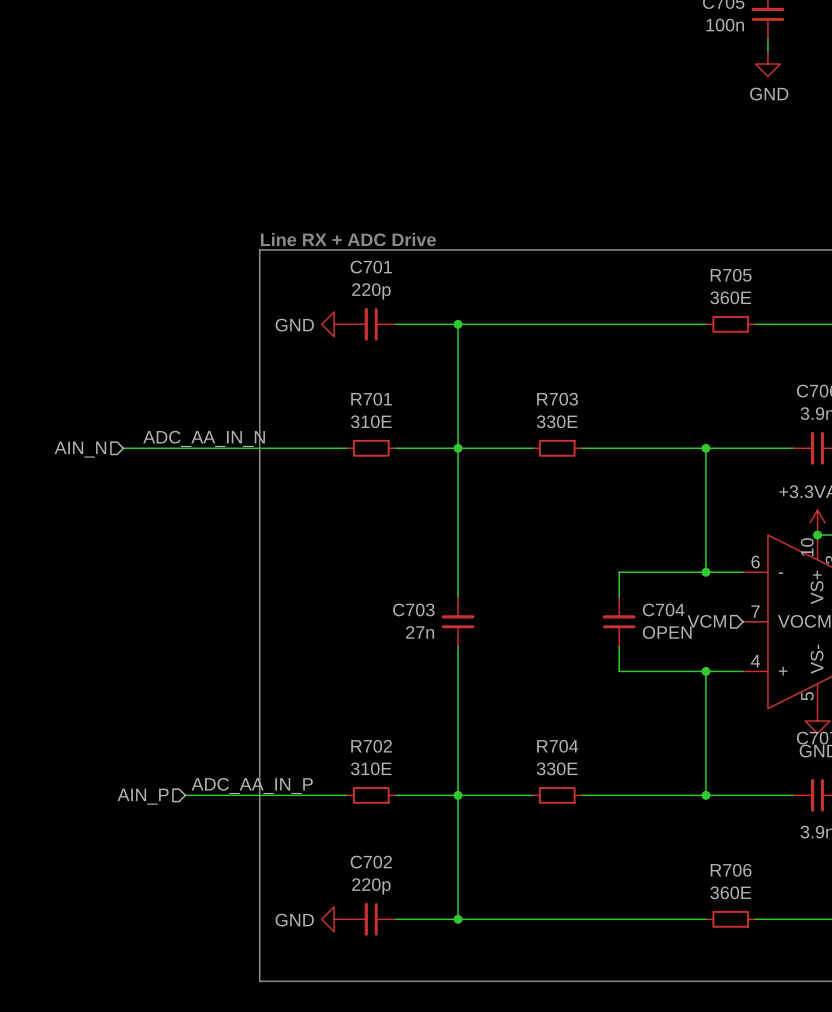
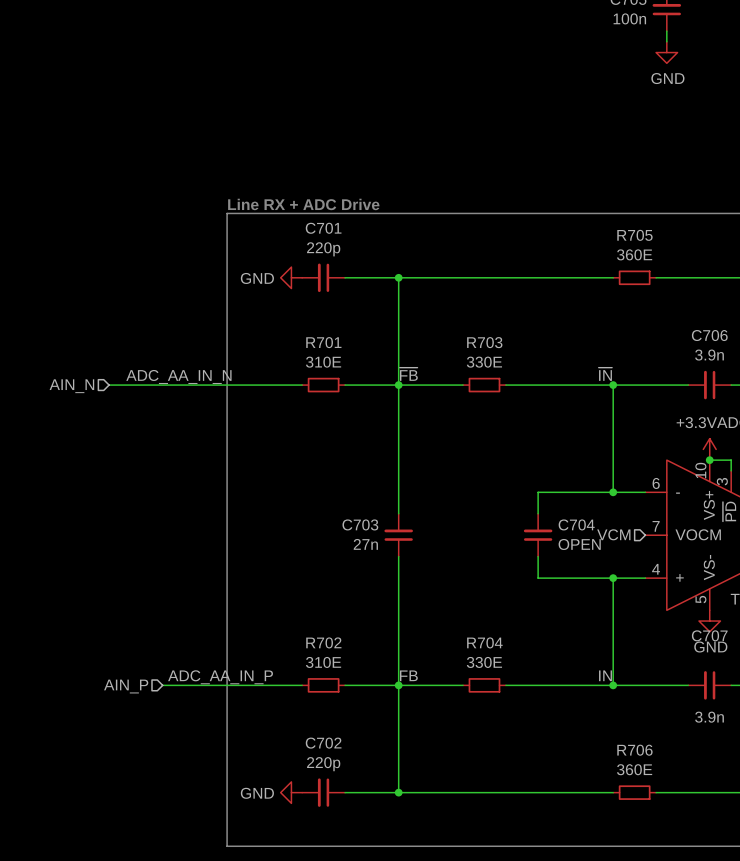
label: none -> ~{FB} (408, 374)
label: none -> ~{IN} (605, 374)
label: none -> FB (408, 675)
label: none -> IN (605, 675)

